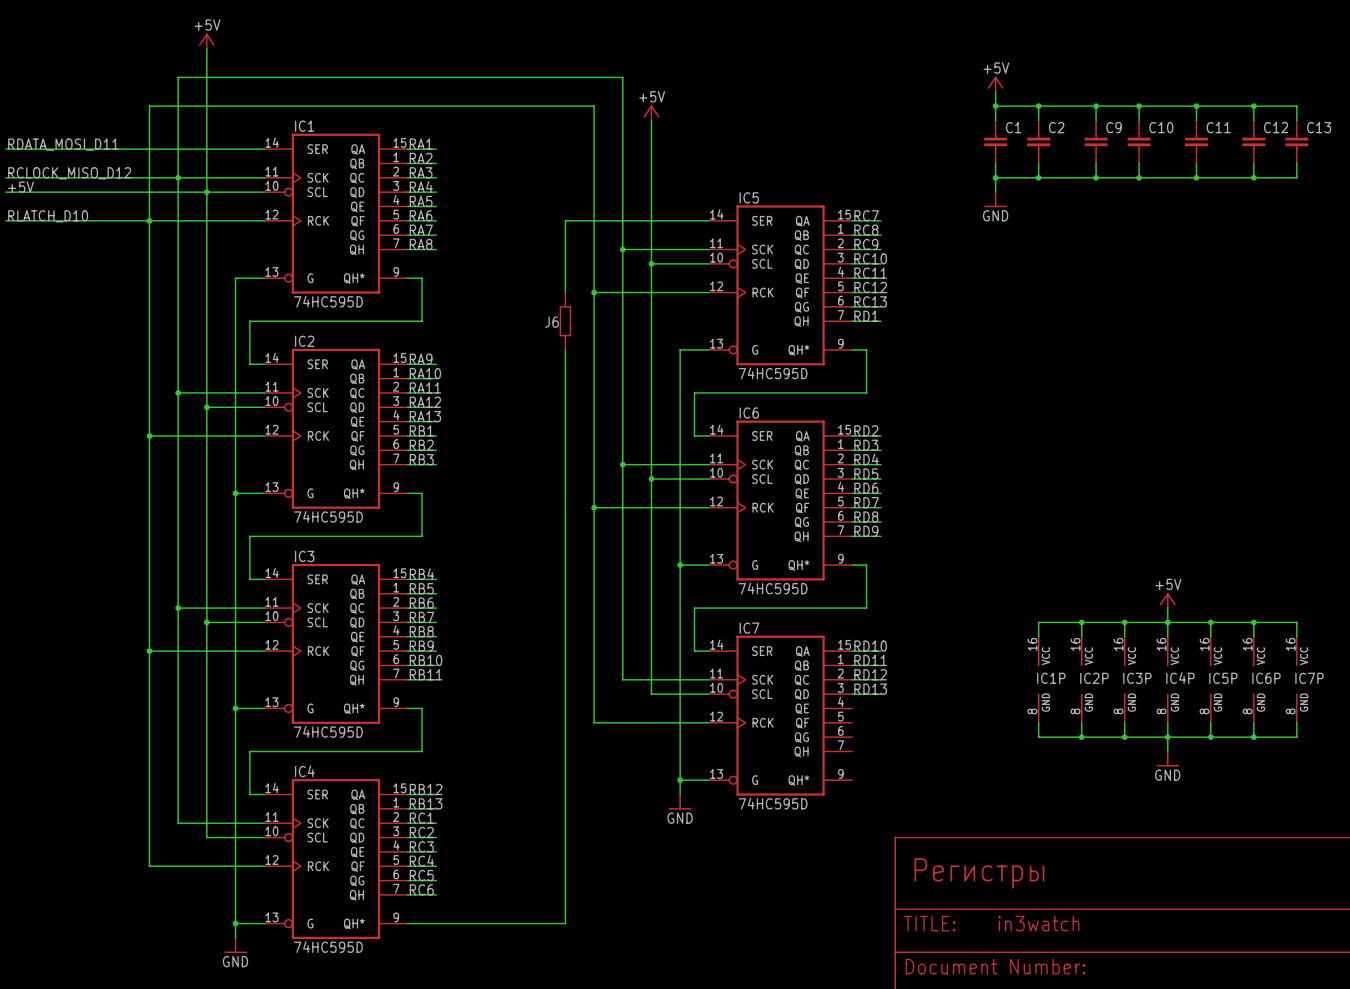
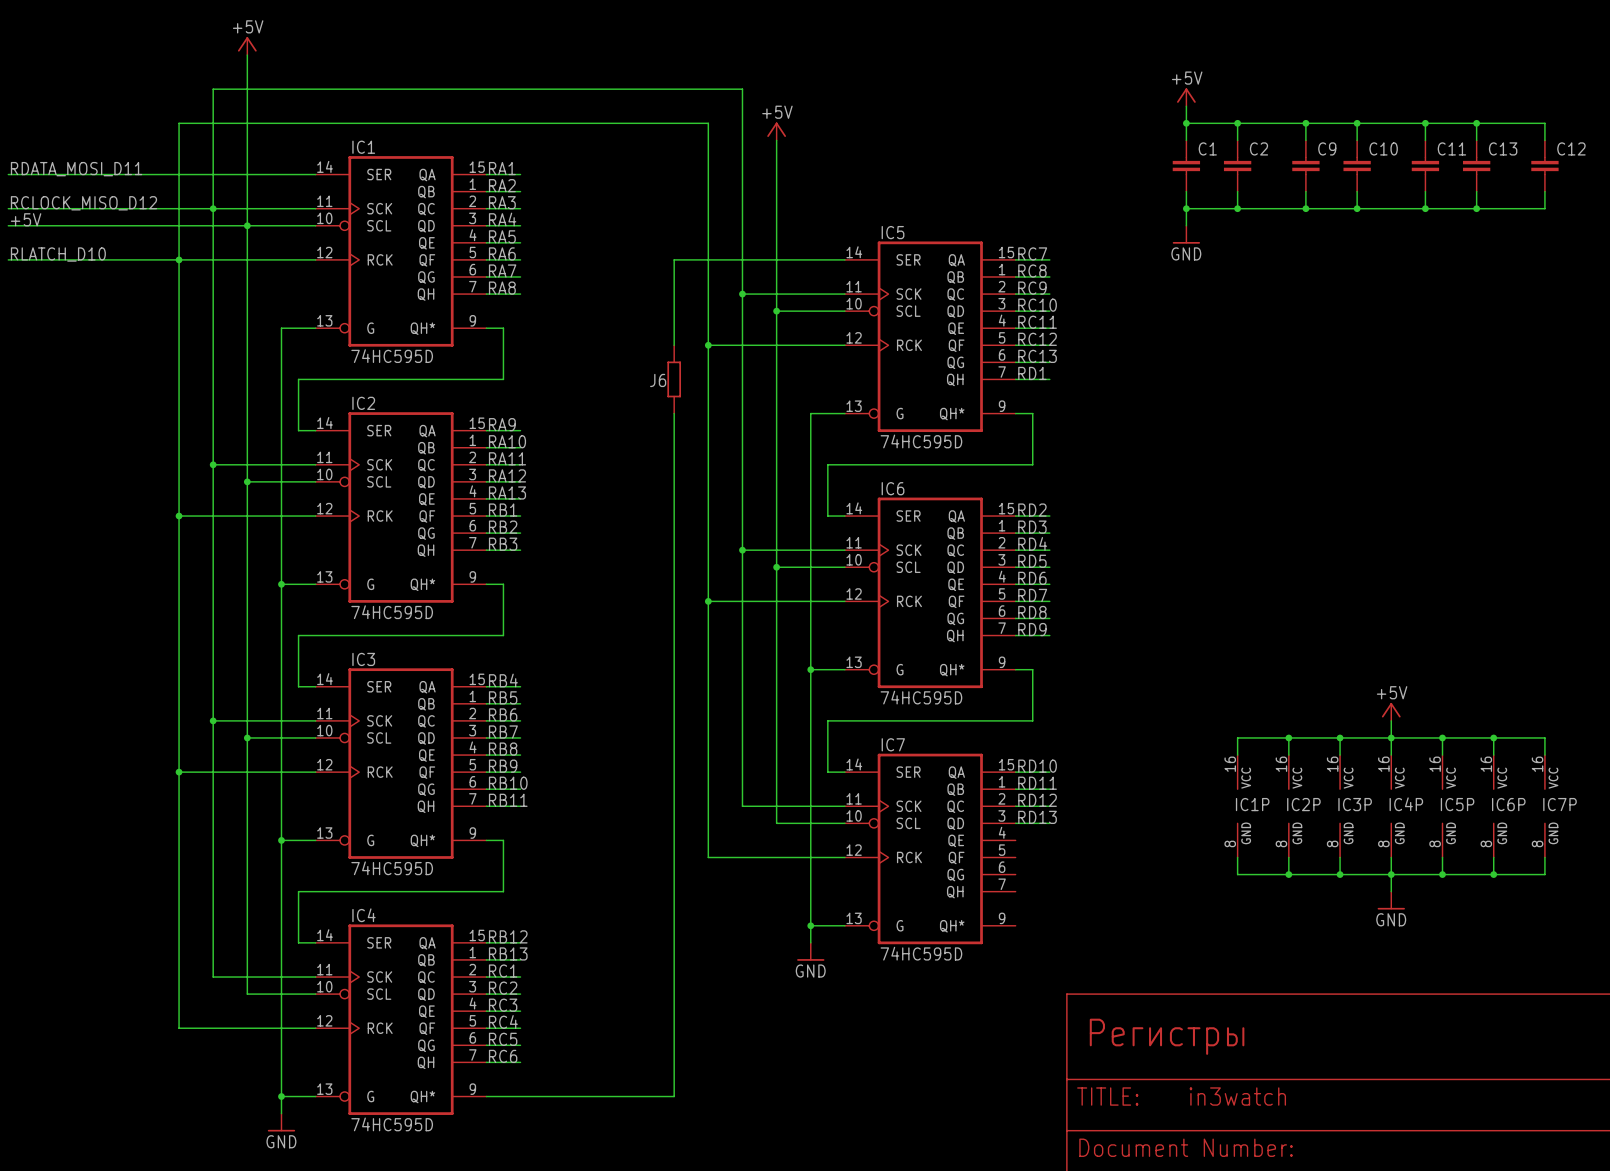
wire: (1253, 106) (1253, 120) -> (1476, 123) (1476, 140)
junction position: (1253, 106) -> (1476, 123)
C13 name: C13 (1319, 127) -> C12 (1571, 148)
C13: none -> (1476, 166)
C12: (1253, 141) -> none
wire: (1253, 163) (1253, 177) -> (1476, 191) (1476, 208)
junction position: (1253, 177) -> (1476, 208)

